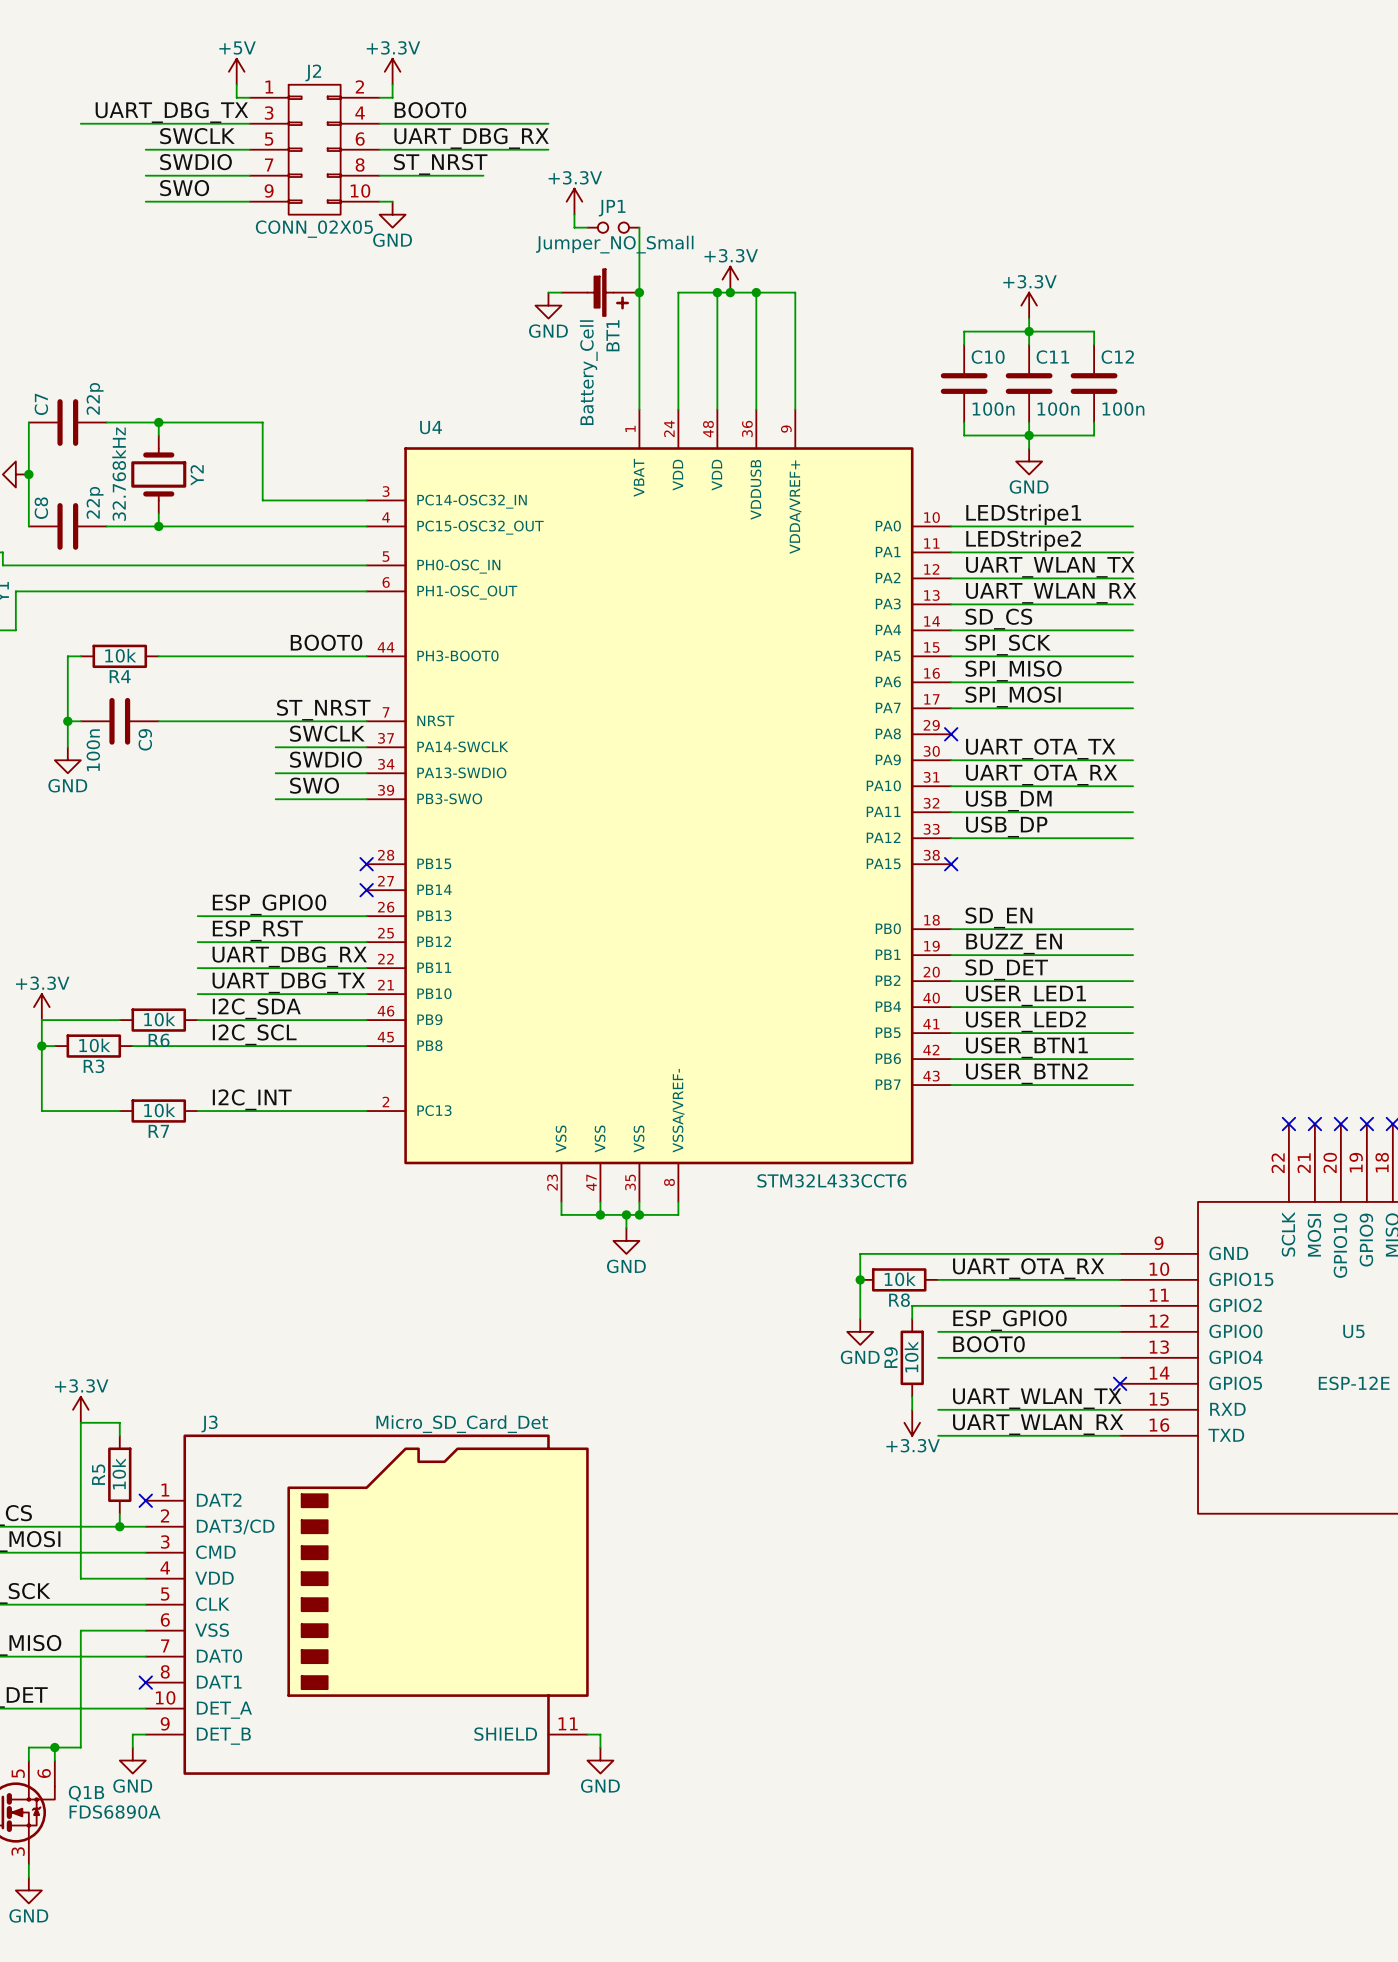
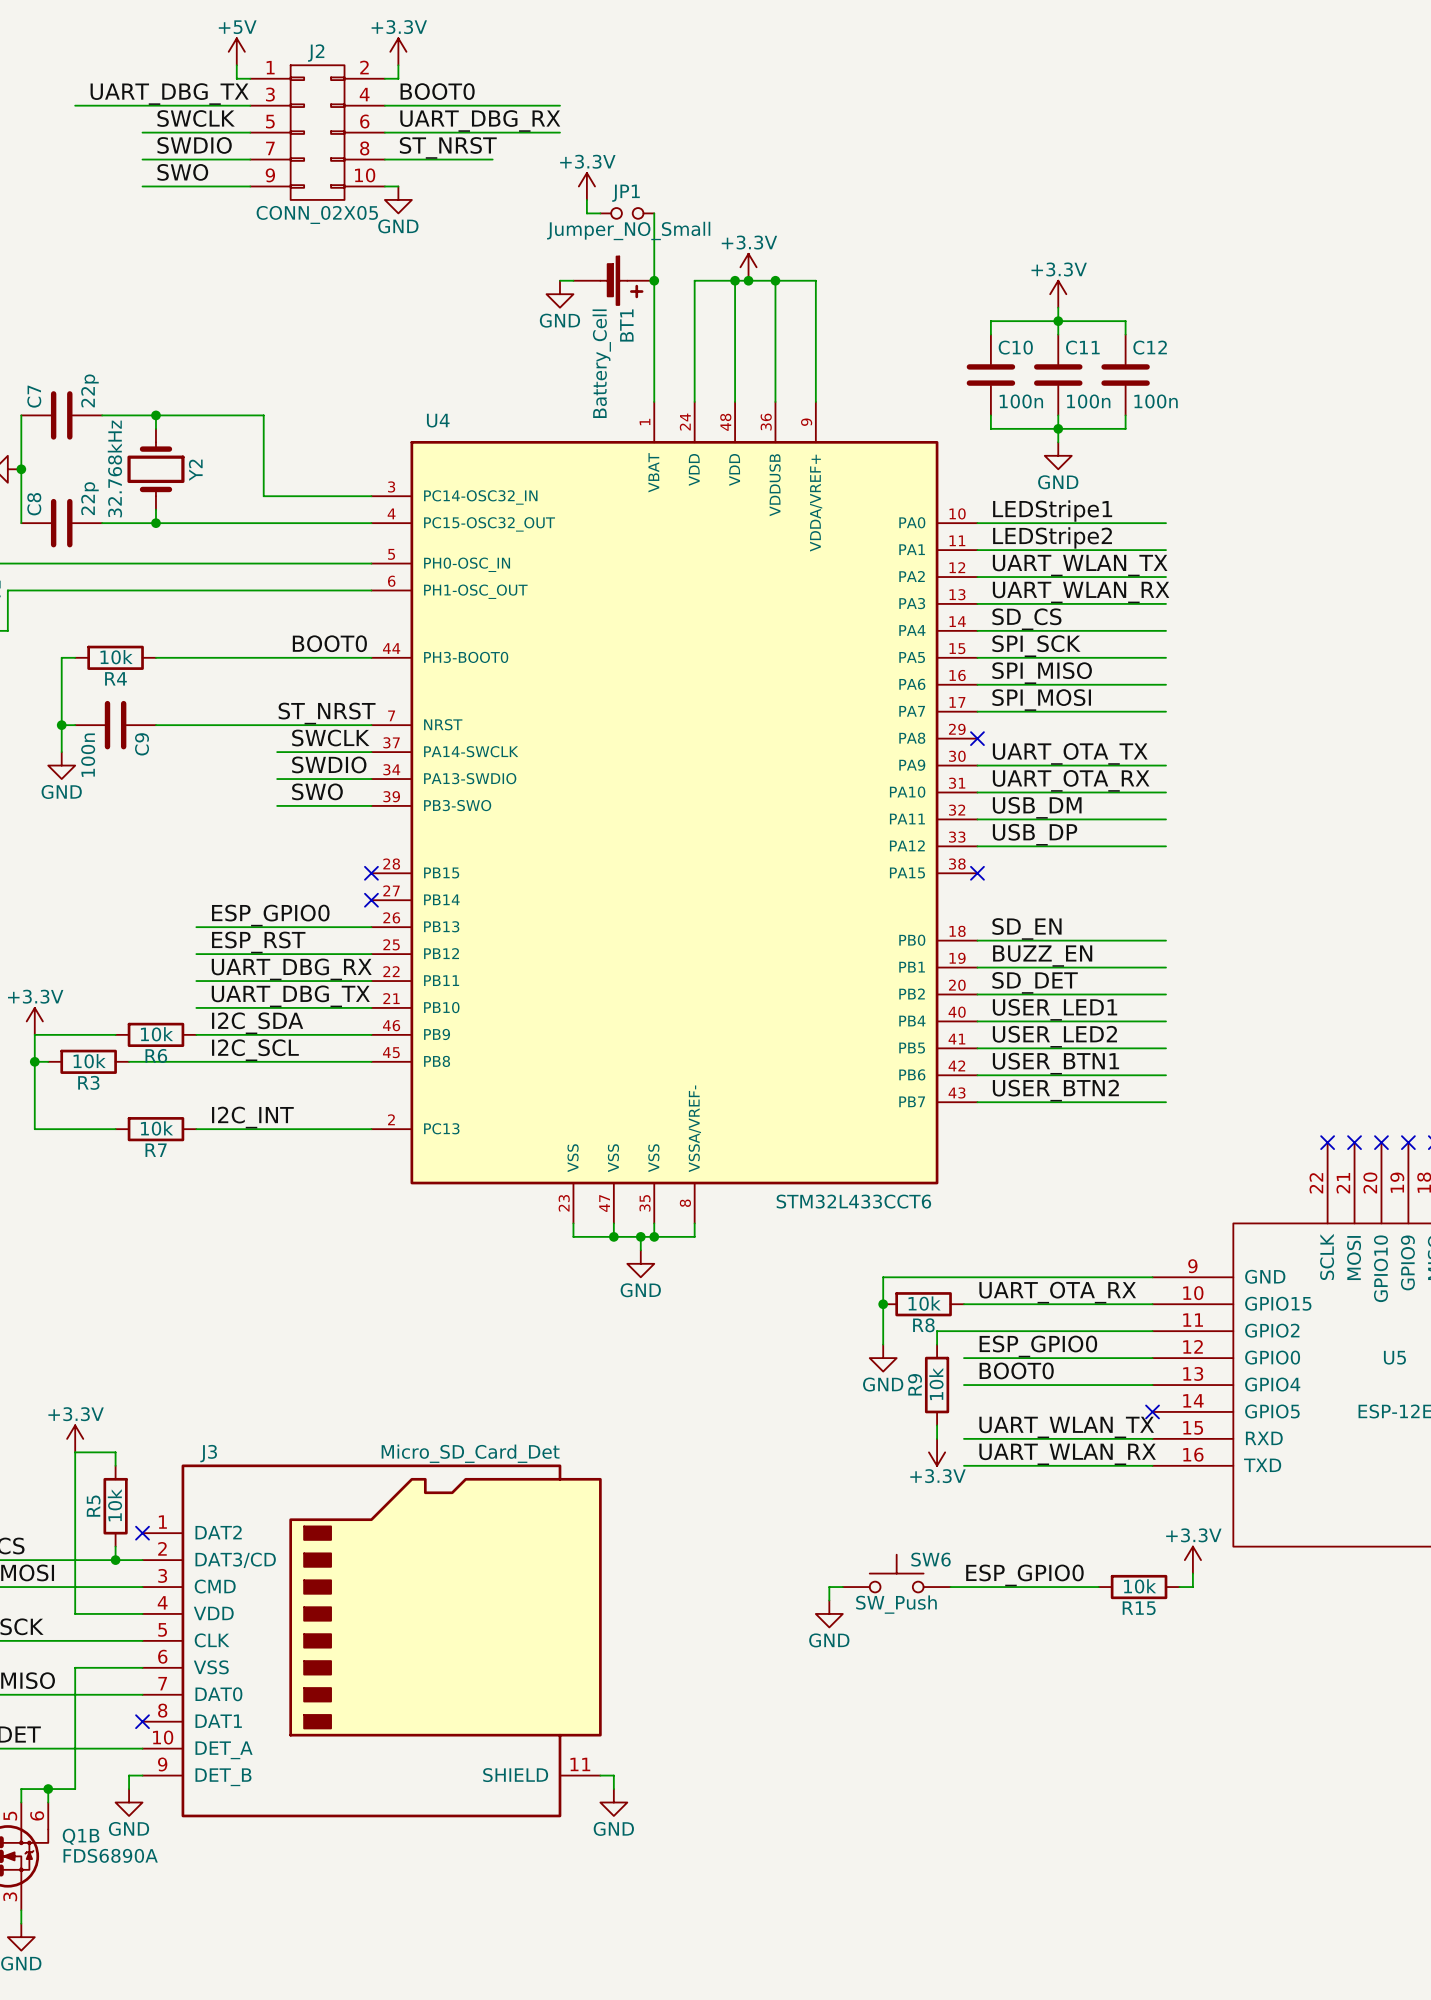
power symbol: none -> +3.3V (1192, 1560)
SW6: none -> SW_Push (896, 1573)
wire: none -> (1192, 1573) (1192, 1587) (1179, 1587)
label: none -> ESP_GPIO0 (1024, 1575)
wire: none -> (842, 1587) (829, 1587) (829, 1600)
wire: none -> (950, 1587) (1098, 1587)
R15: none -> 10k (1139, 1587)
power symbol: none -> GND (829, 1613)

